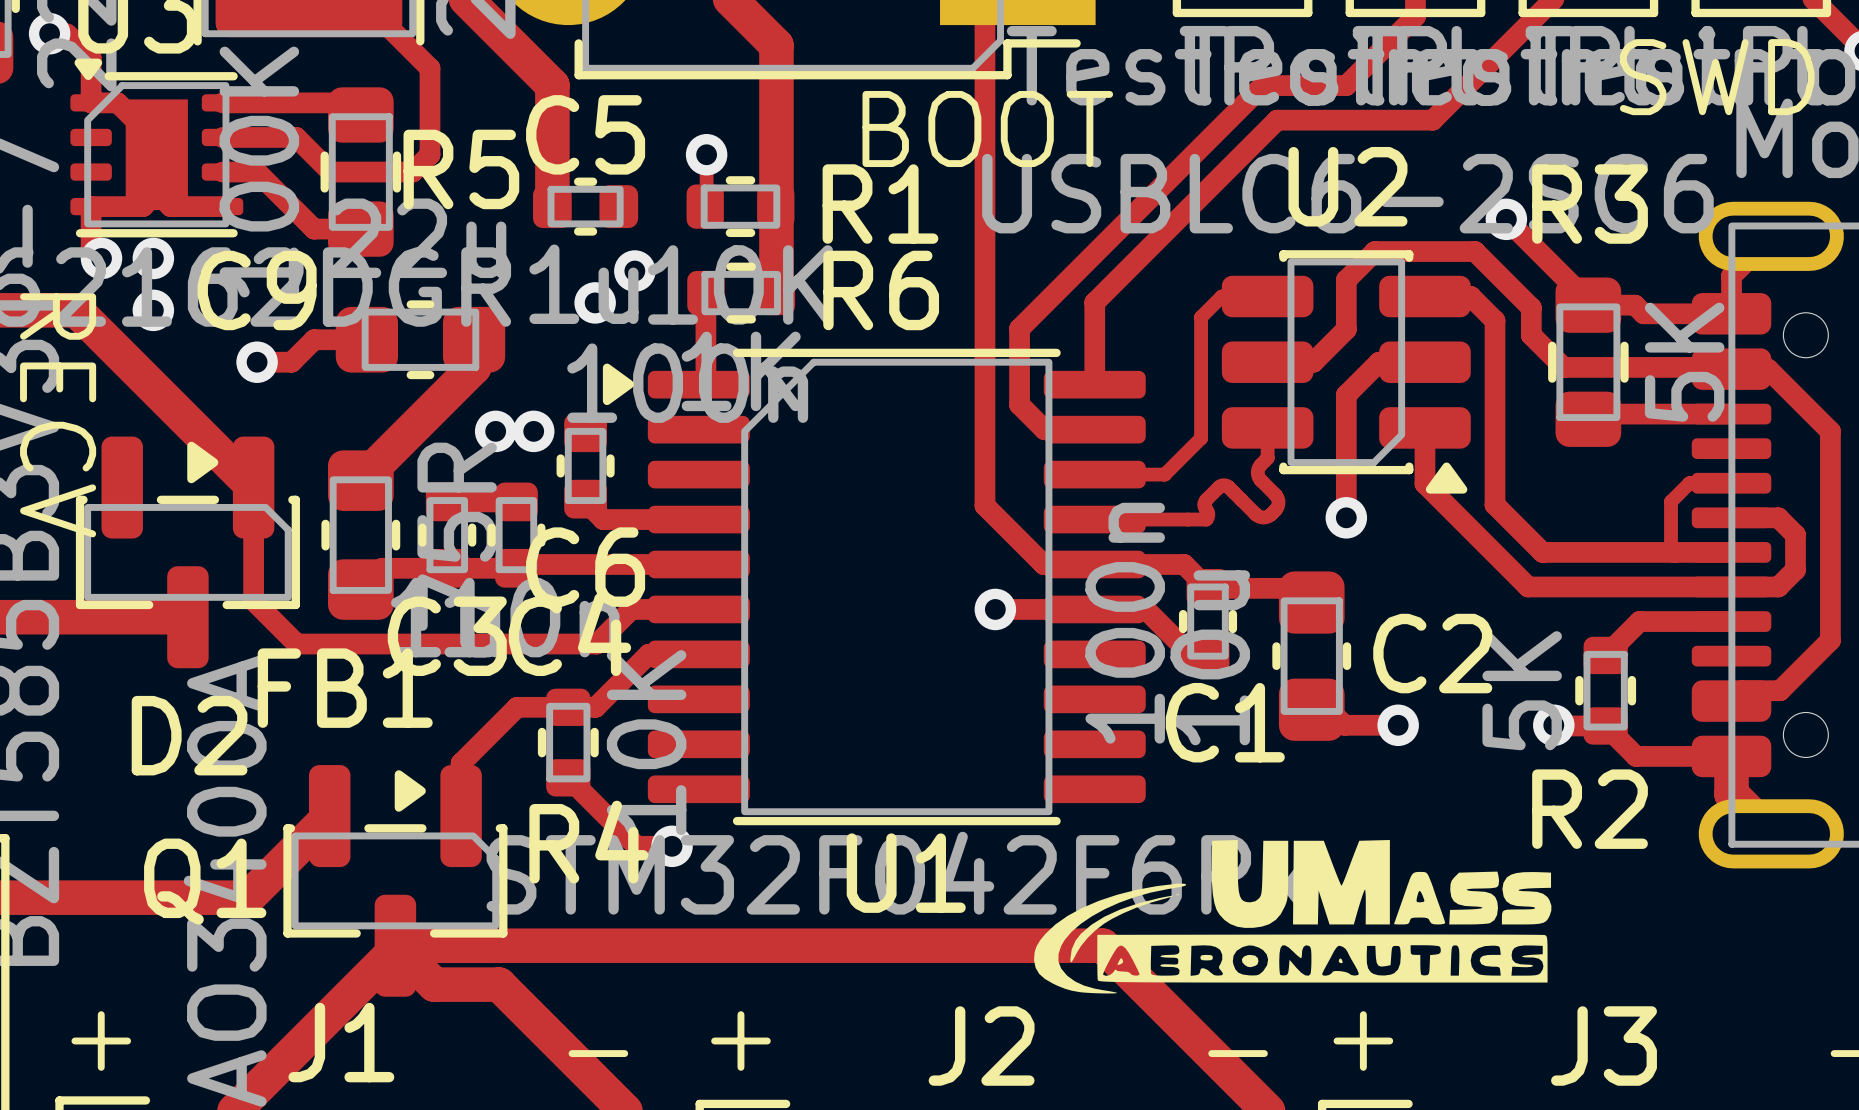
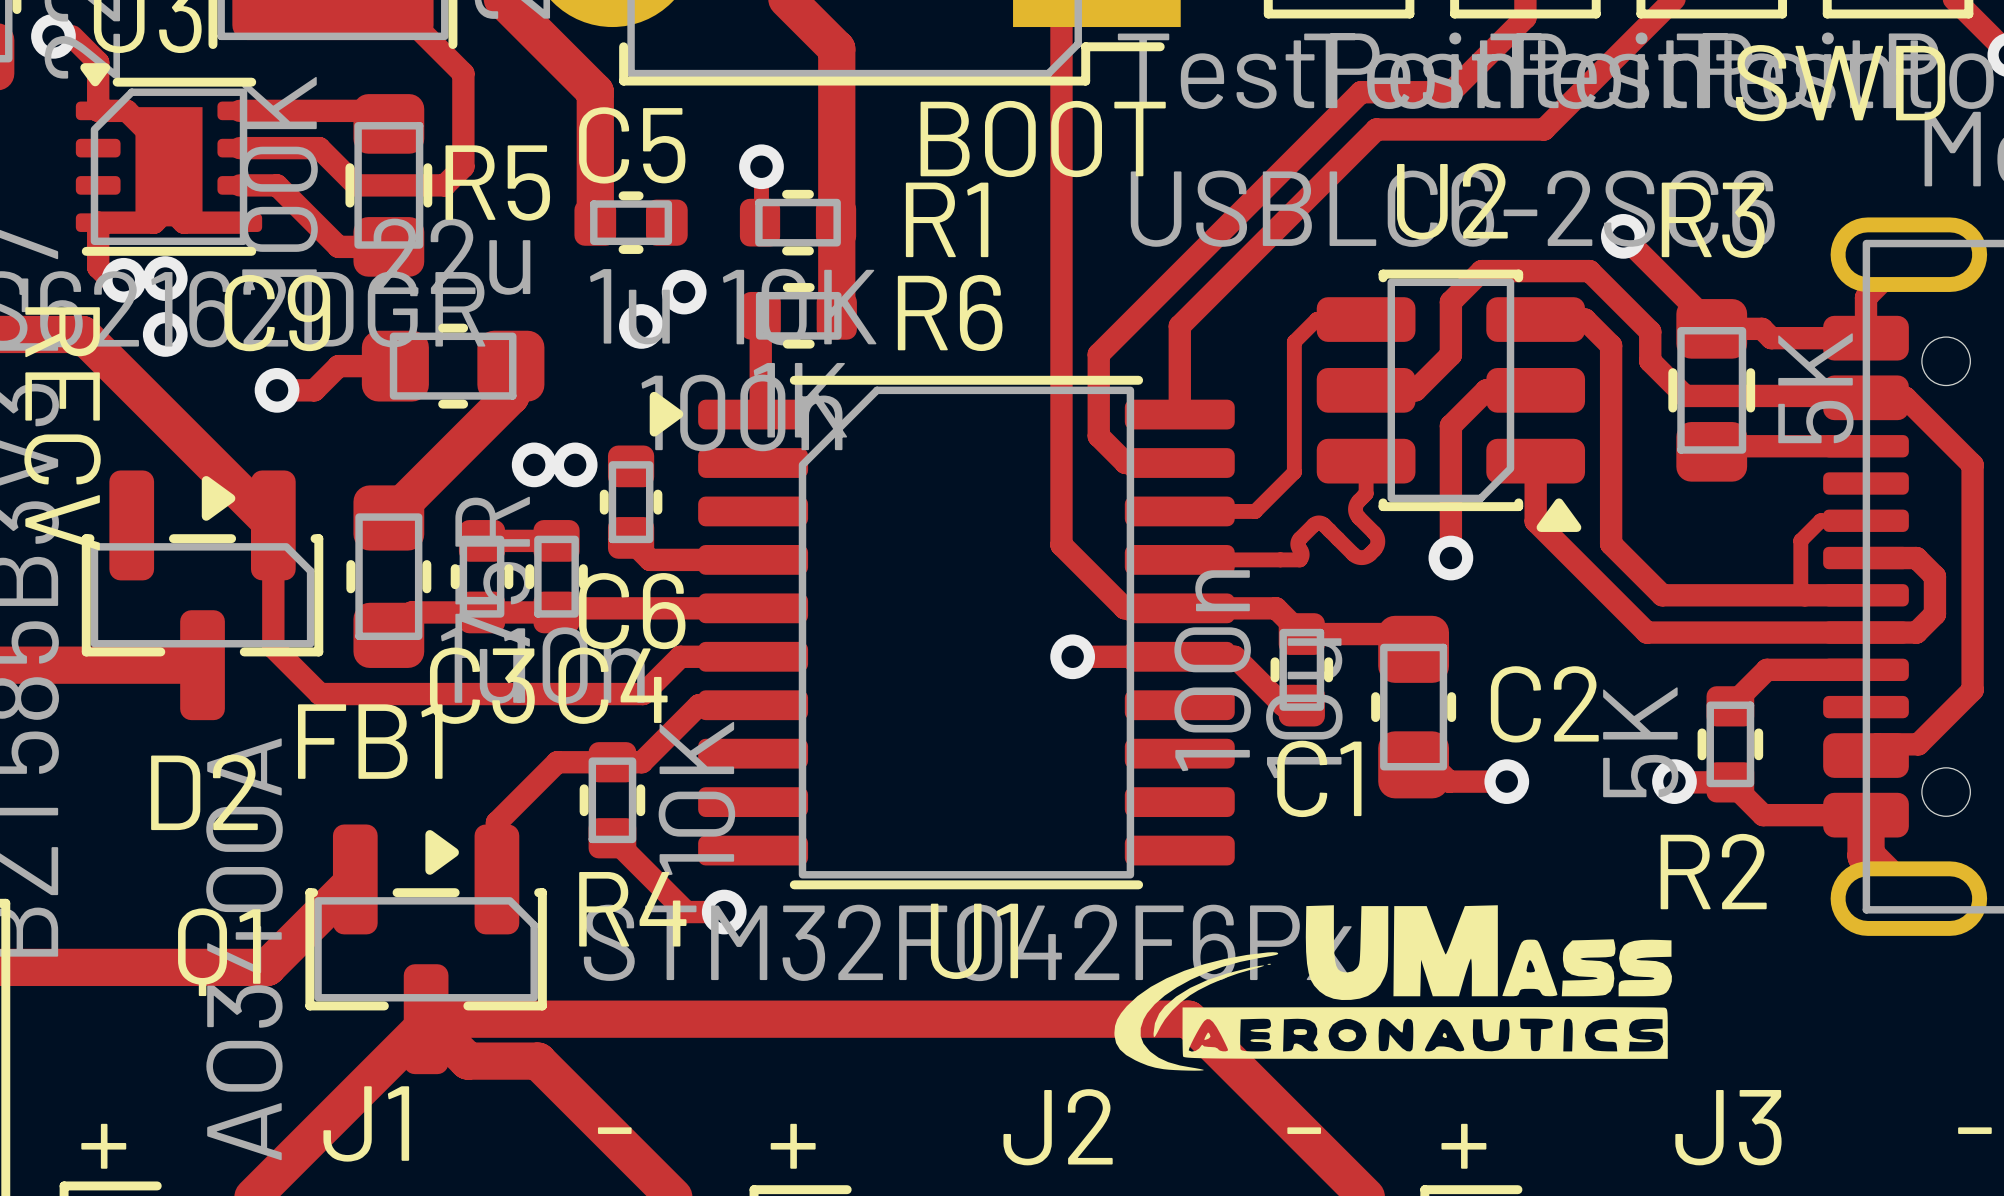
via position: (101, 258) -> (123, 280)

